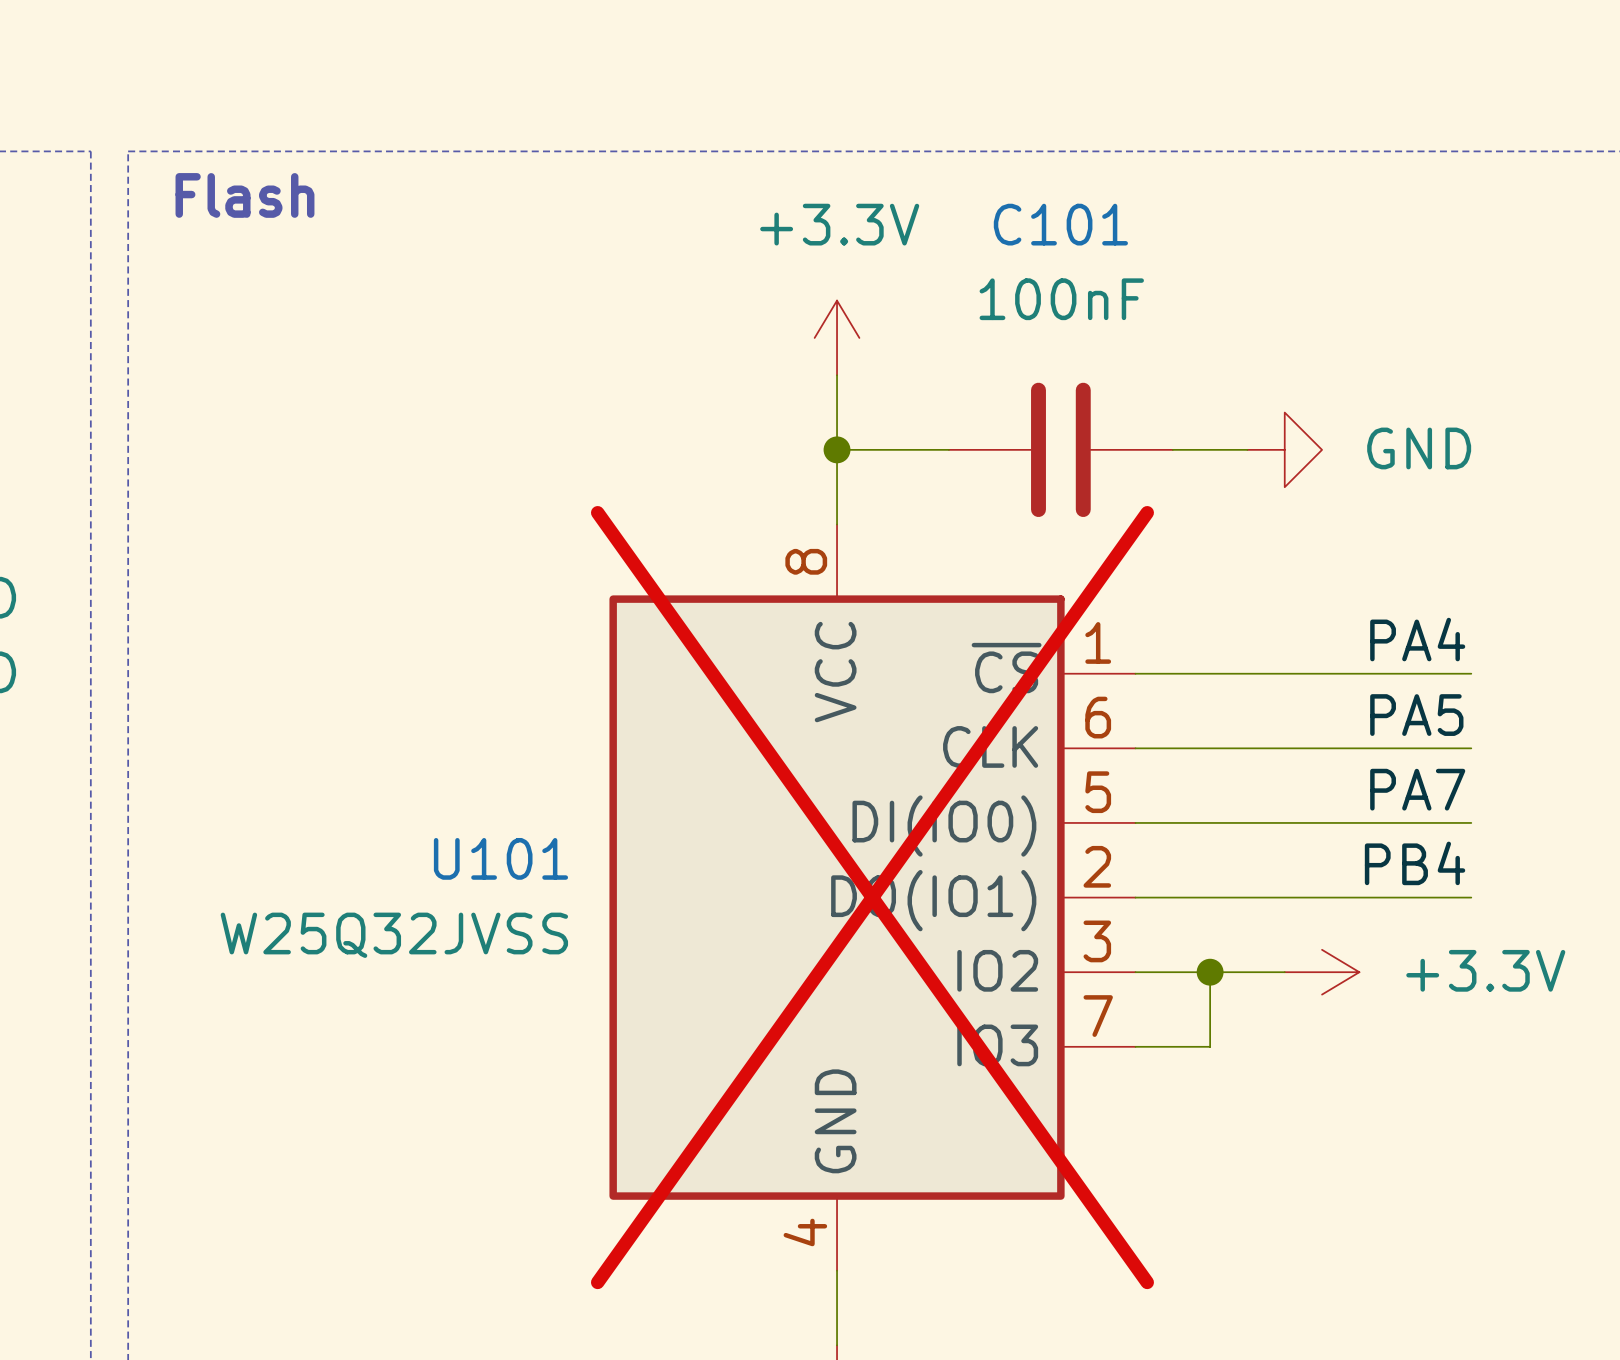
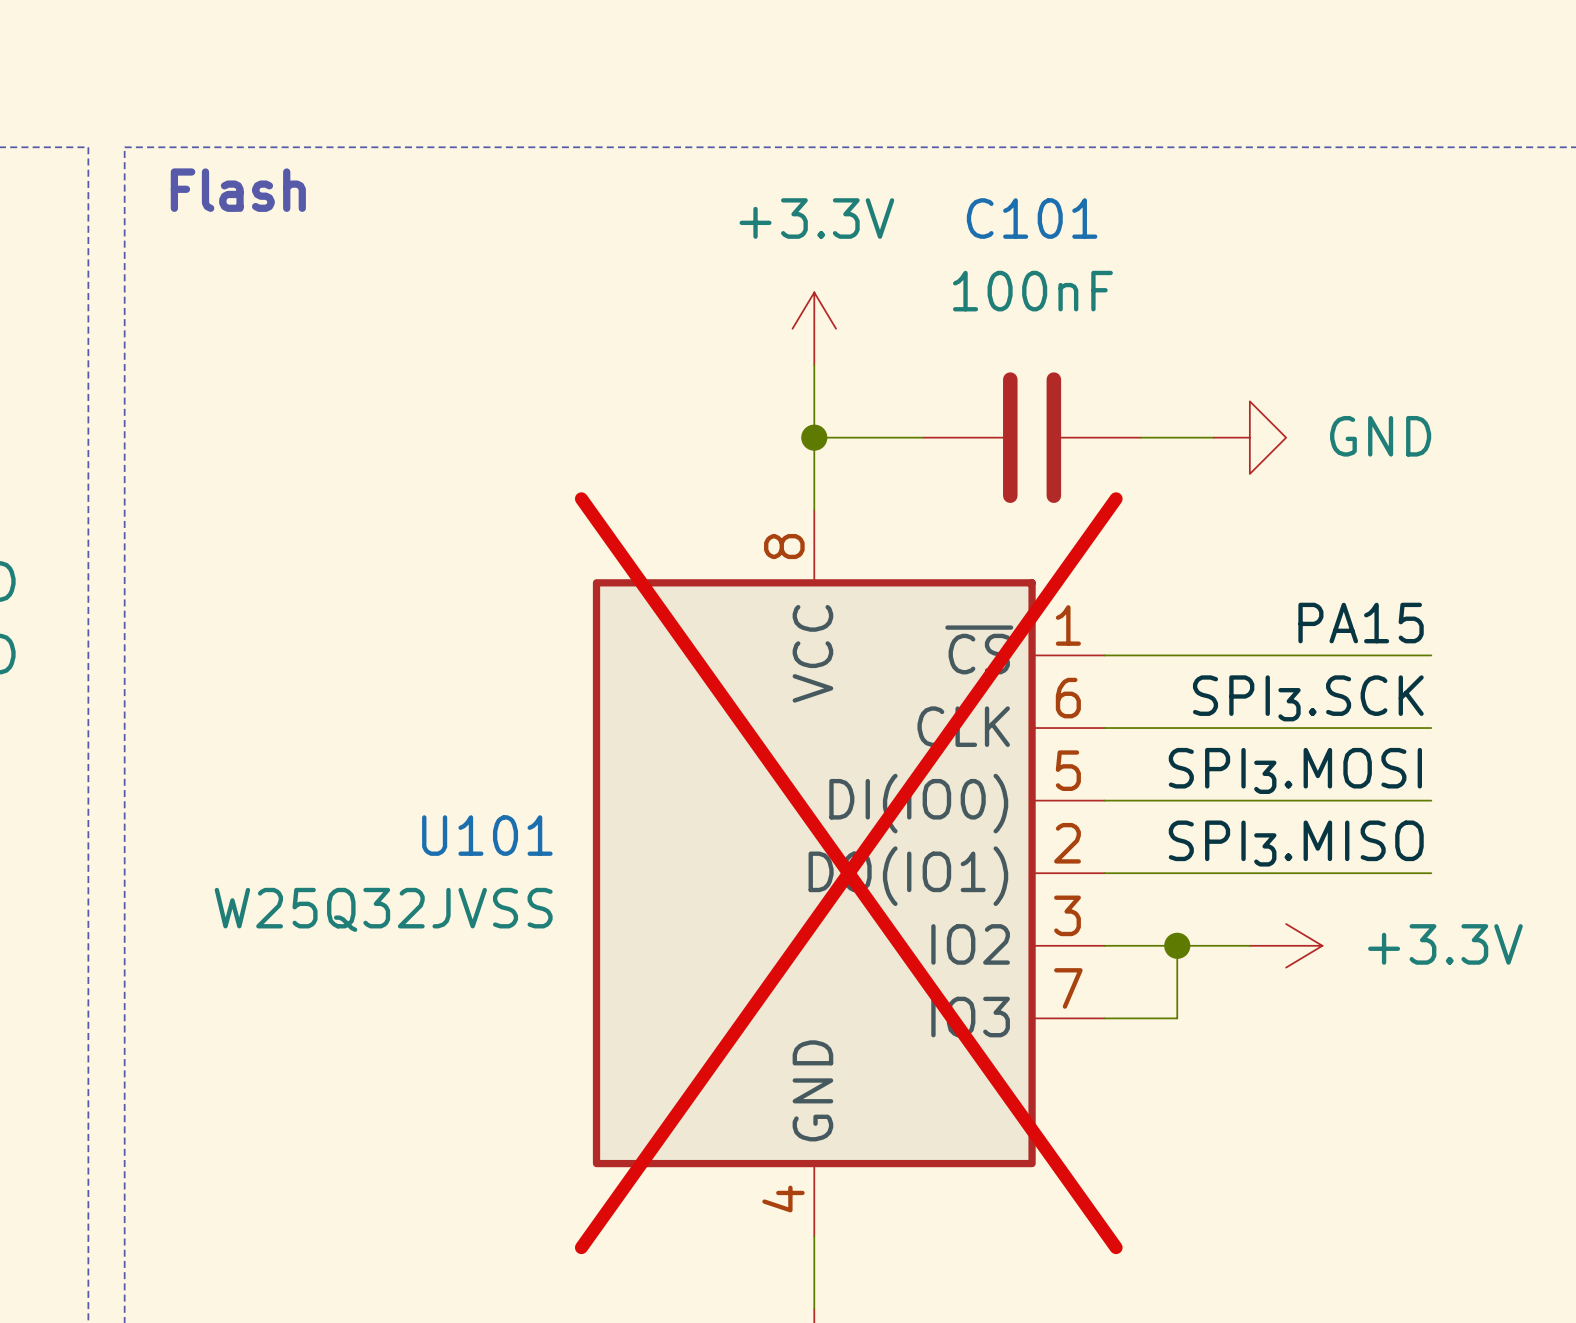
label: PA4 (1417, 639) -> PA15 (1361, 623)
label: PA5 (1416, 715) -> SPI3.SCK (1308, 698)
label: PA7 (1417, 789) -> SPI3.MOSI (1295, 770)
label: PB4 (1415, 863) -> SPI3.MISO (1296, 843)

